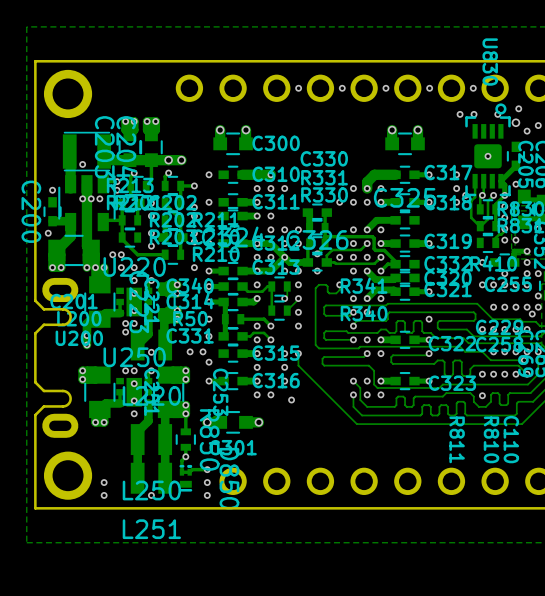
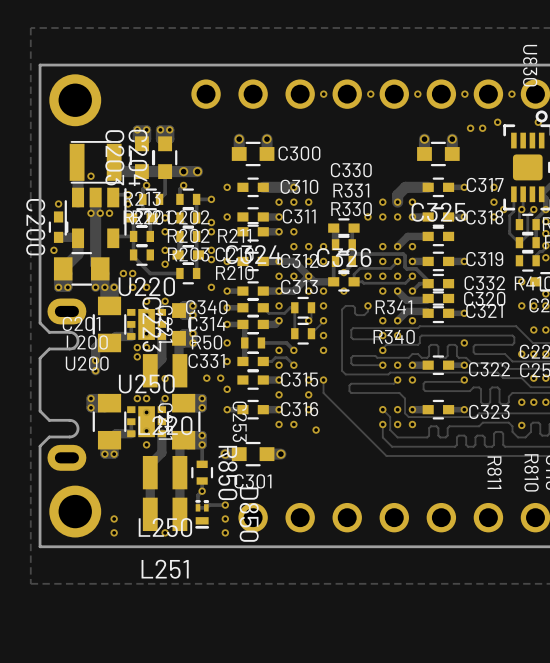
via: (474, 114) -> none
via: none -> (470, 128)
via: none -> (482, 128)
via: (488, 156) -> none

